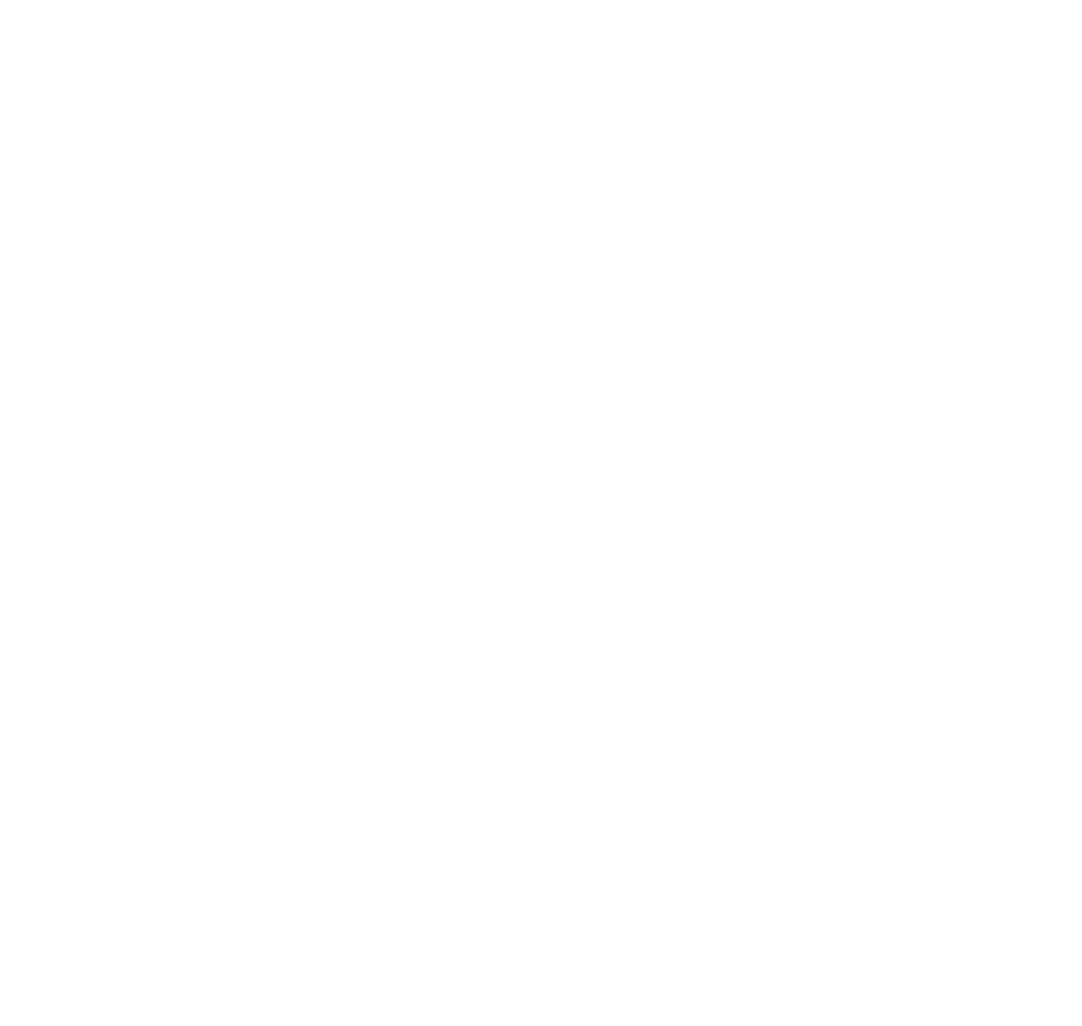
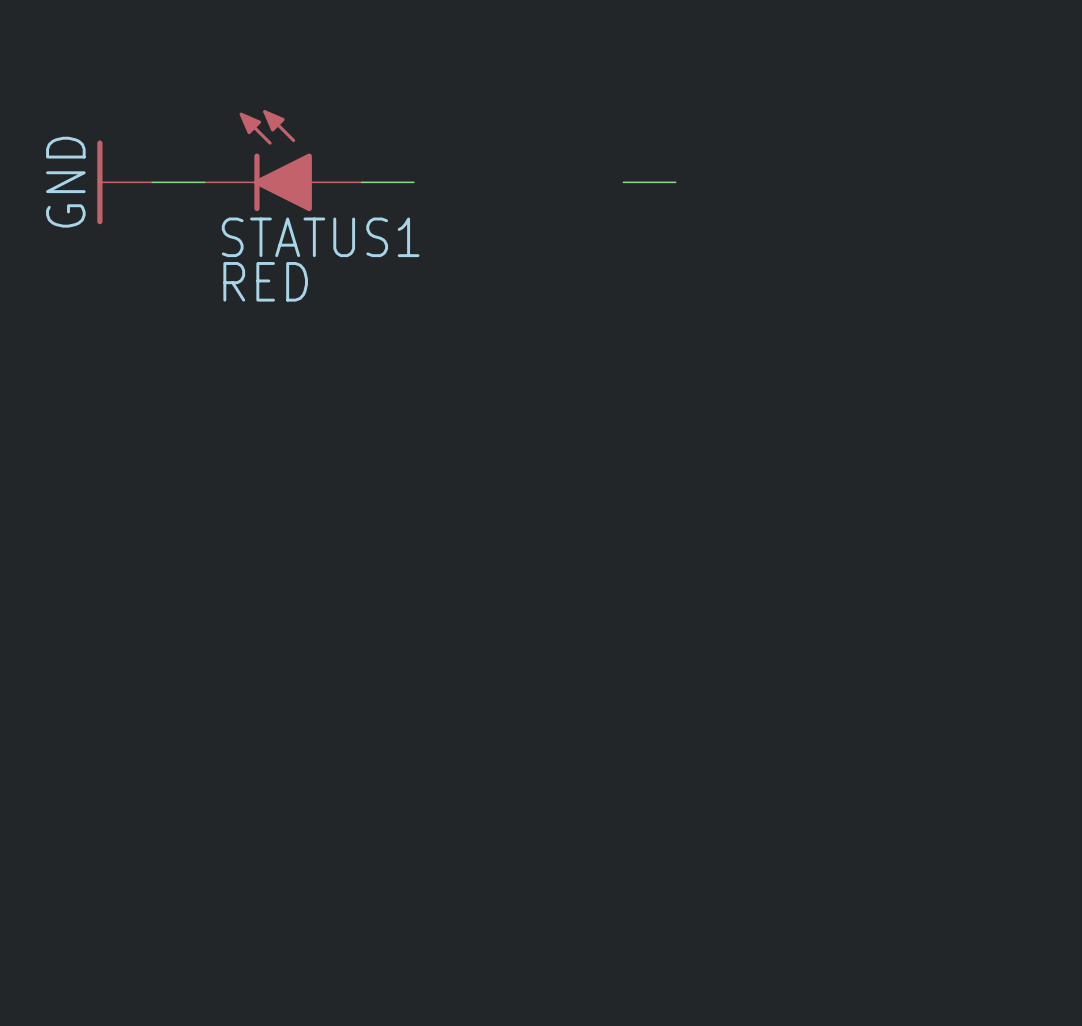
STATUS1: none -> RED (283, 160)
power symbol: none -> GND (124, 182)
wire: none -> (152, 182) (204, 182)
wire: none -> (361, 182) (413, 182)
wire: none -> (623, 182) (675, 182)

